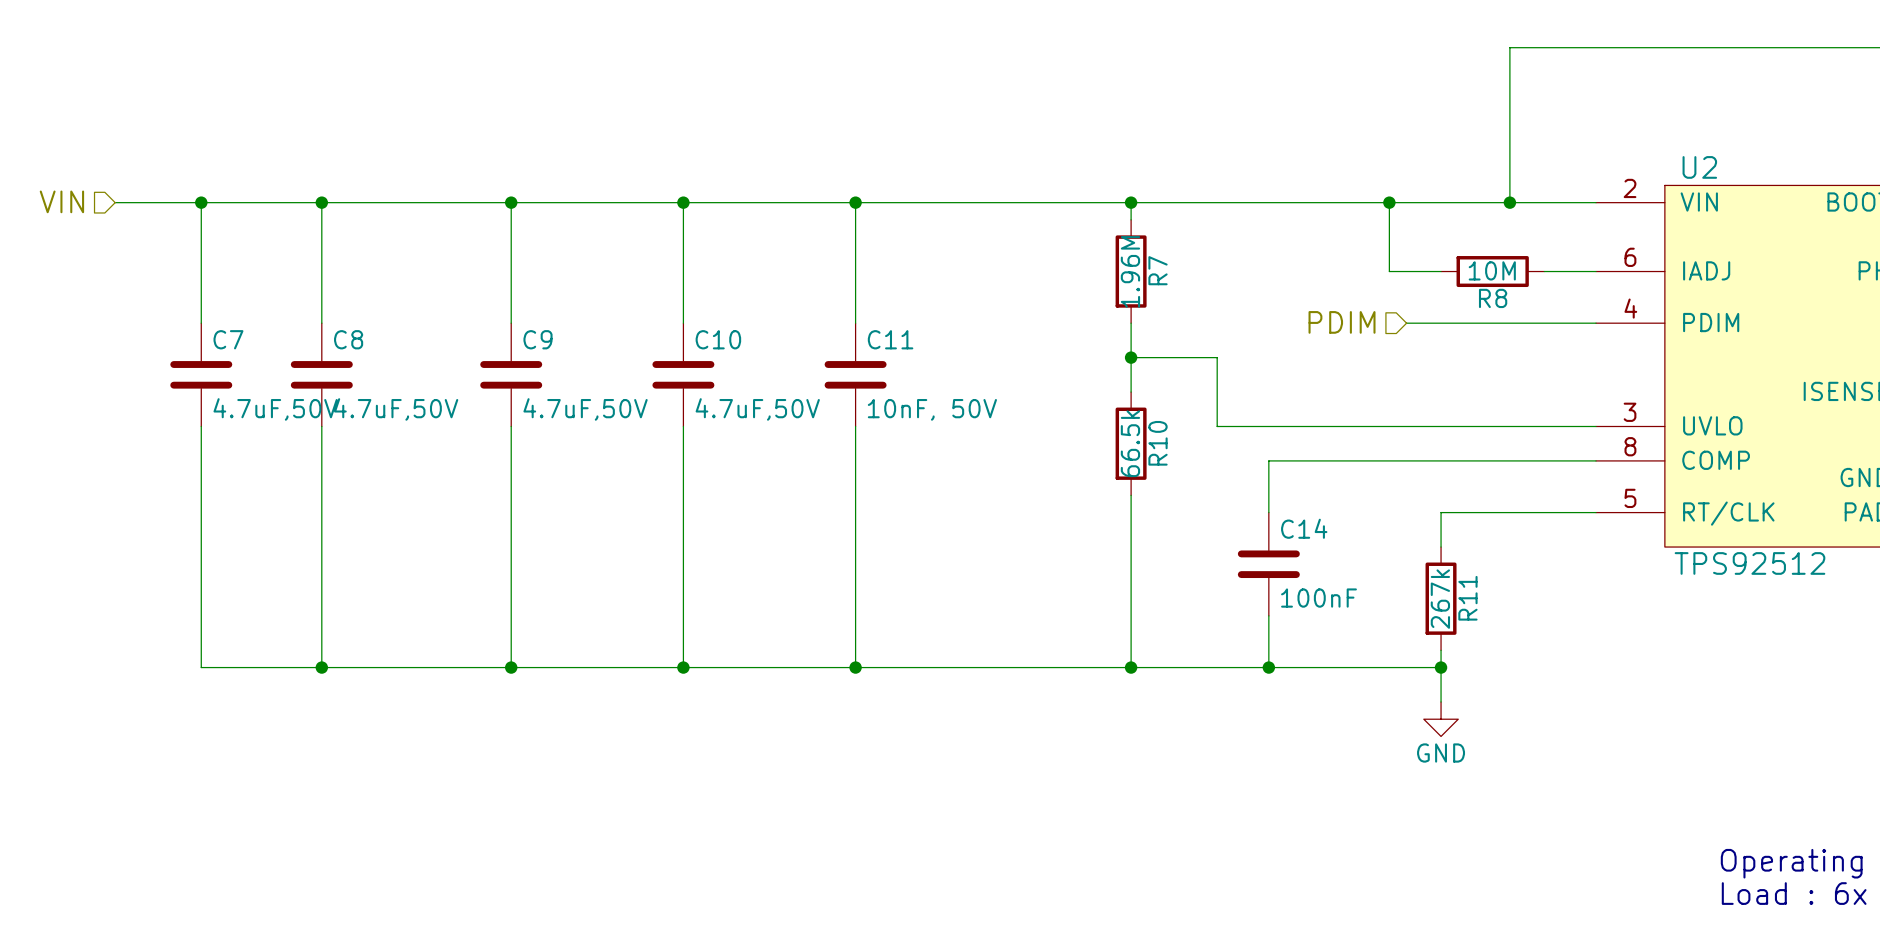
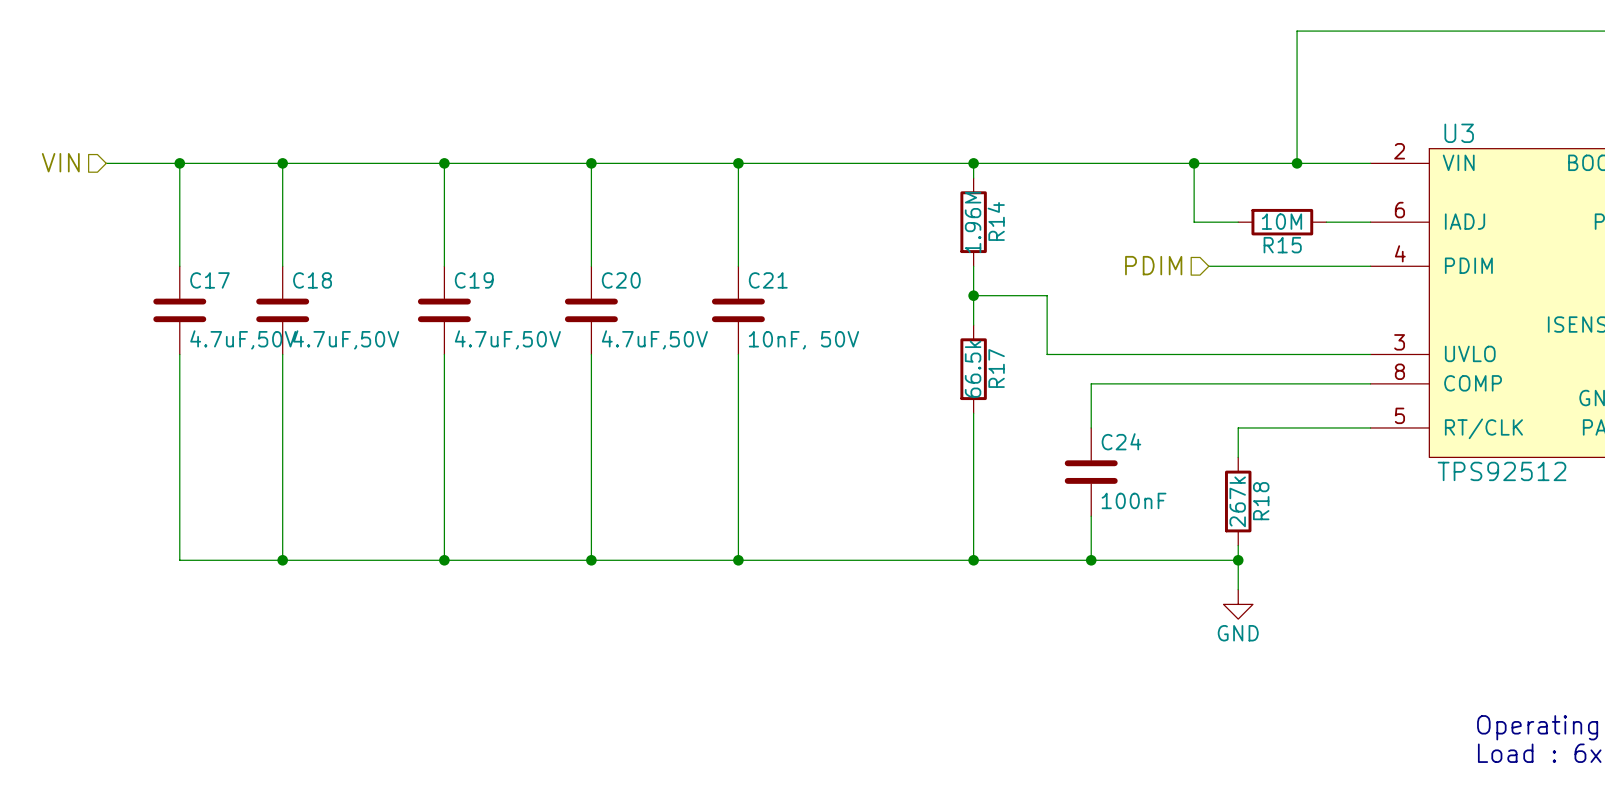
U2 name: U2 (1699, 167) -> U3 (1459, 133)
R7 name: R7 (1158, 270) -> R14 (996, 221)
R8 name: R8 (1493, 298) -> R15 (1282, 245)
C7 name: C7 (228, 339) -> C17 (209, 280)
C8 name: C8 (348, 339) -> C18 (312, 280)
C9 name: C9 (537, 339) -> C19 (474, 280)
C10 name: C10 (718, 339) -> C20 (621, 280)
C11 name: C11 (890, 339) -> C21 (768, 280)
R10 name: R10 (1158, 443) -> R17 (996, 368)
C14 name: C14 (1304, 528) -> C24 (1121, 441)
R11 name: R11 (1467, 598) -> R18 (1261, 501)

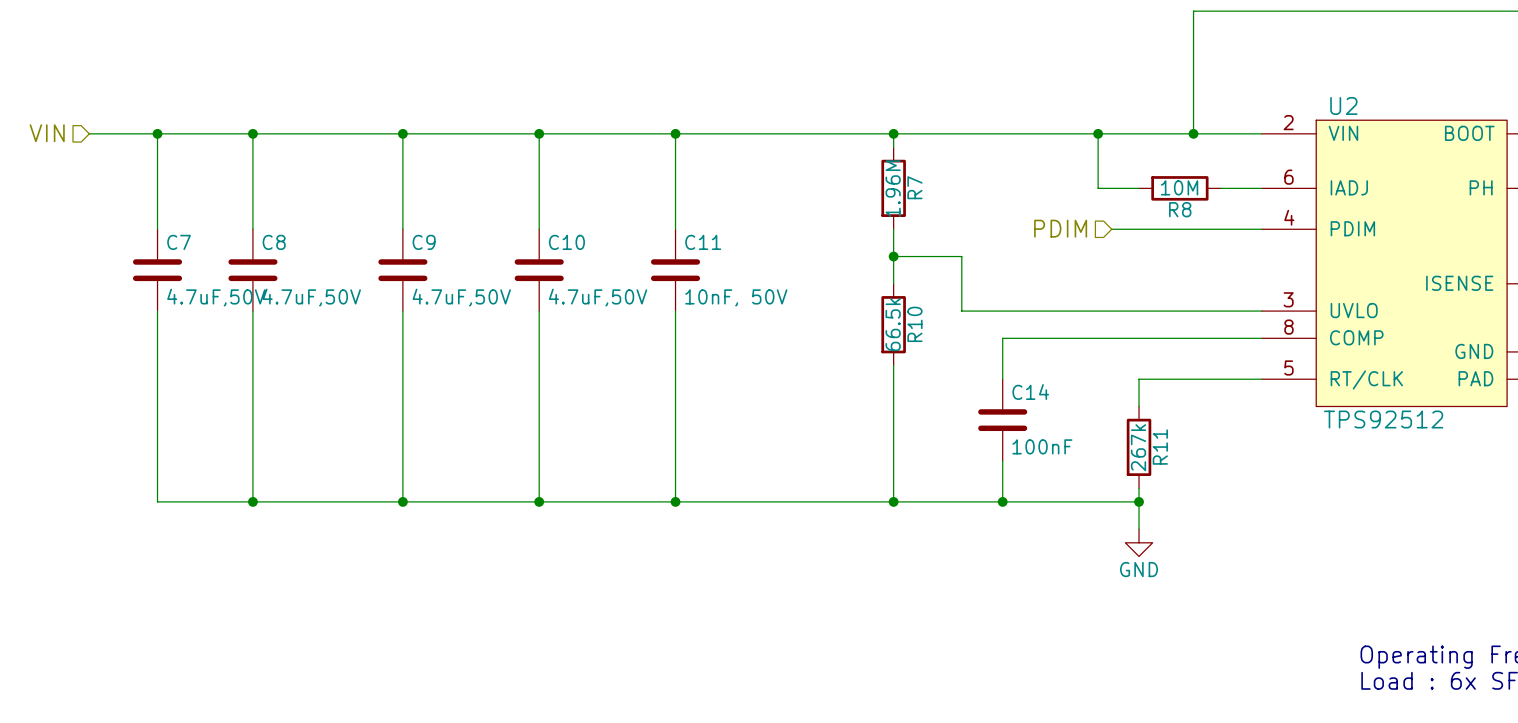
U3 name: U3 (1459, 133) -> U2 (1343, 105)
R14 name: R14 (996, 221) -> R7 (914, 187)
R15 name: R15 (1282, 245) -> R8 (1180, 209)
C17 name: C17 (209, 280) -> C7 (179, 242)
C18 name: C18 (312, 280) -> C8 (274, 242)
C19 name: C19 (474, 280) -> C9 (424, 242)
C20 name: C20 (621, 280) -> C10 (566, 242)
C21 name: C21 (768, 280) -> C11 (703, 242)
R17 name: R17 (996, 368) -> R10 (914, 324)
C24 name: C24 (1121, 441) -> C14 (1030, 392)
R18 name: R18 (1261, 501) -> R11 (1160, 447)

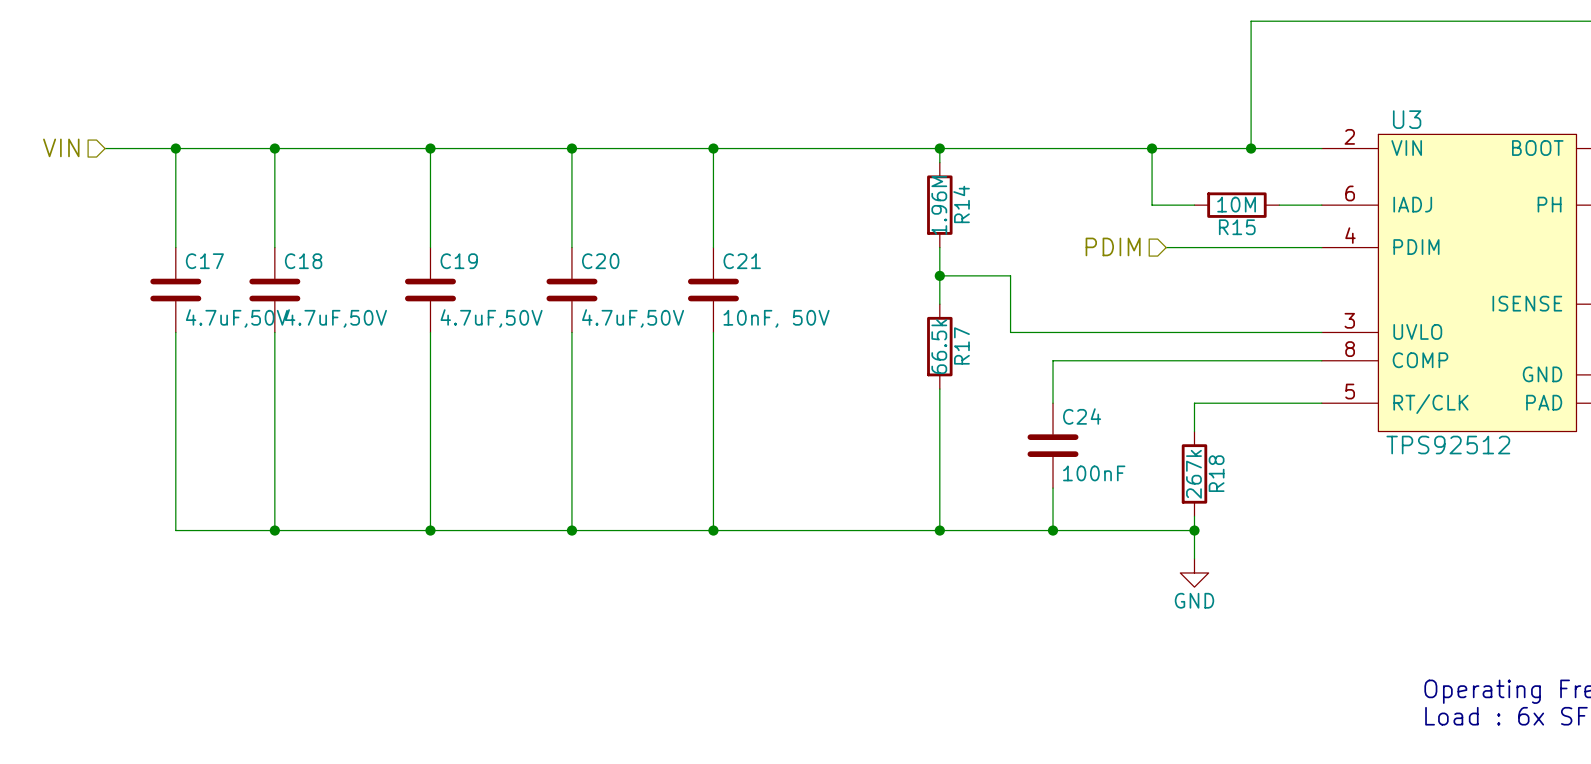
U2 name: U2 (1343, 105) -> U3 (1407, 119)
R7 name: R7 (914, 187) -> R14 (961, 204)
R8 name: R8 (1180, 209) -> R15 (1237, 227)
C7 name: C7 (179, 242) -> C17 (204, 261)
C8 name: C8 (274, 242) -> C18 (303, 261)
C9 name: C9 (424, 242) -> C19 (459, 261)
C10 name: C10 (566, 242) -> C20 (600, 261)
C11 name: C11 (703, 242) -> C21 (742, 261)
R10 name: R10 (914, 324) -> R17 (961, 345)
C14 name: C14 (1030, 392) -> C24 (1082, 416)
R11 name: R11 (1160, 447) -> R18 (1216, 473)

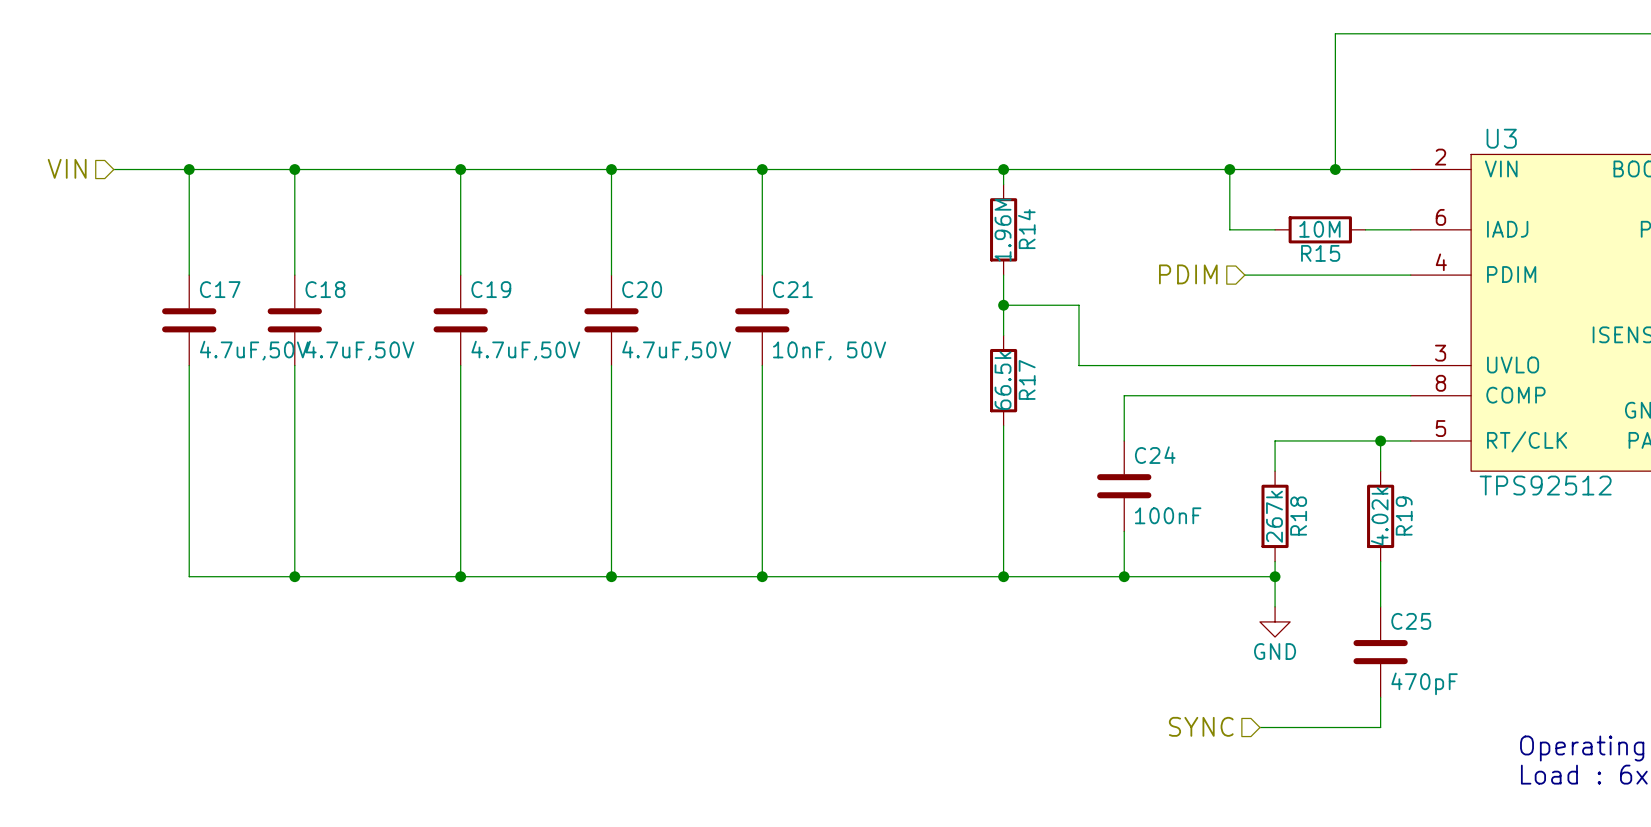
wire: none -> (1380, 440) (1380, 471)
junction: none -> (1380, 440)
R19: none -> 4.02k (1380, 516)
wire: none -> (1380, 561) (1380, 606)
C25: none -> 470pF (1380, 652)
wire: none -> (1380, 697) (1380, 727) (1259, 727)
hierarchical label: none -> SYNC (1201, 726)

